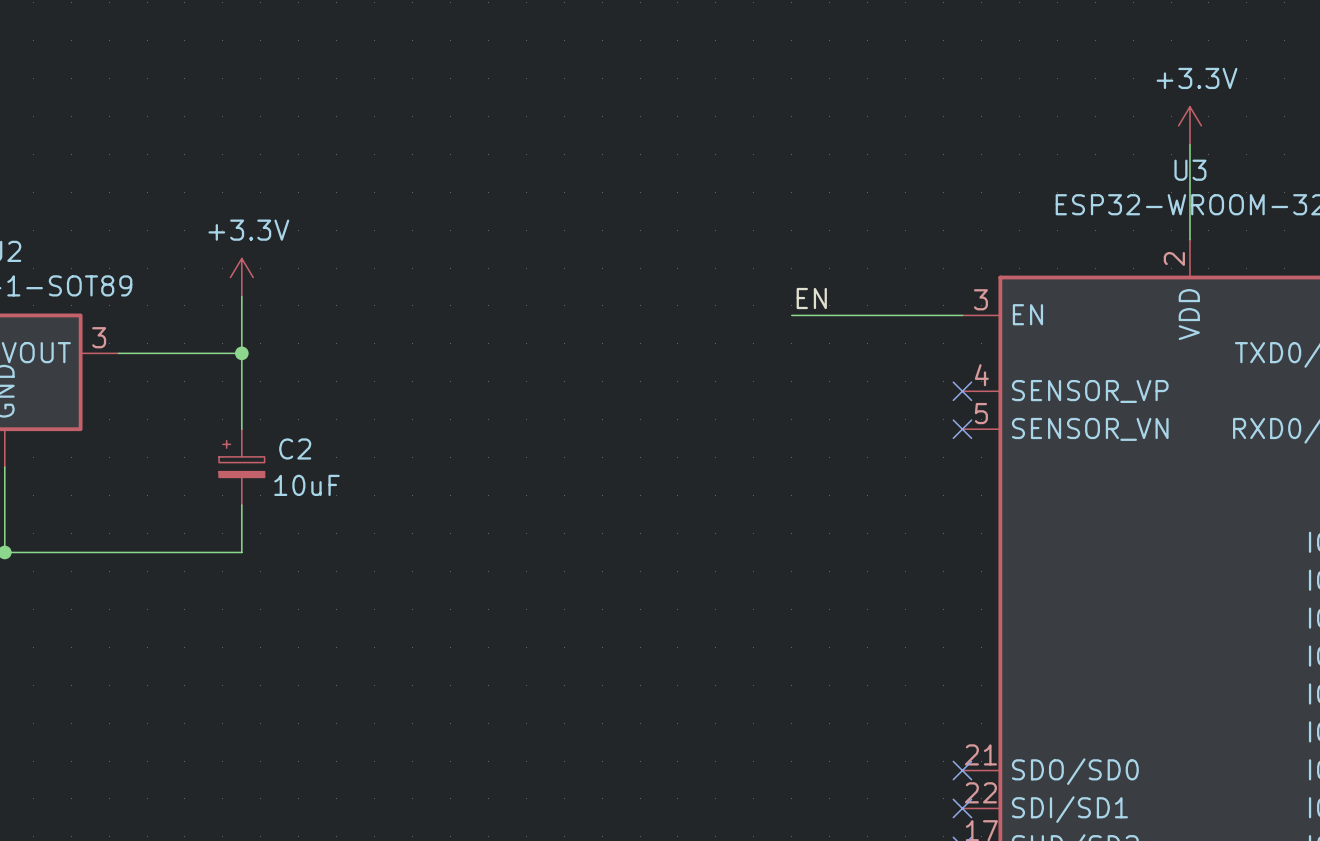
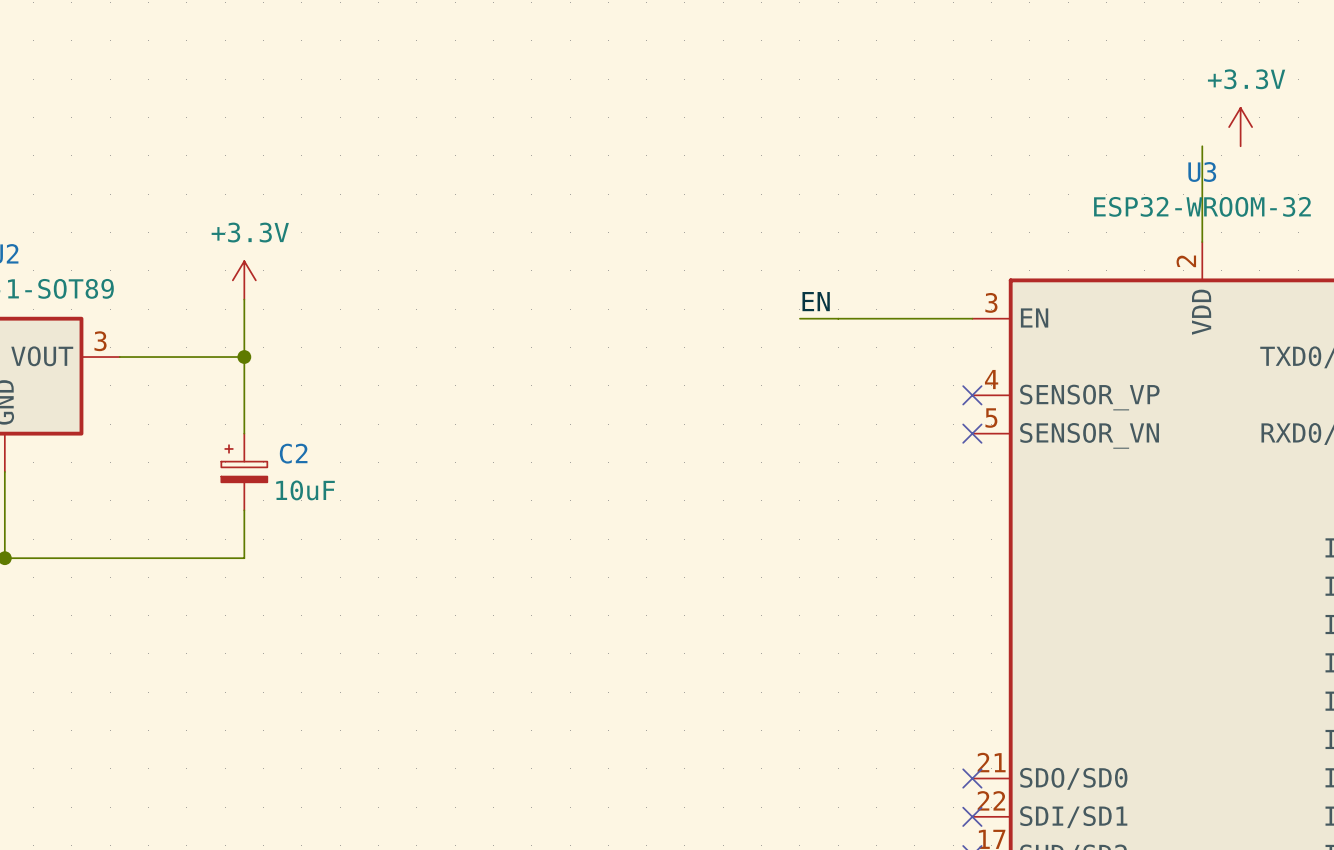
power symbol position: +3.3V (1189, 125) -> +3.3V (1240, 127)

